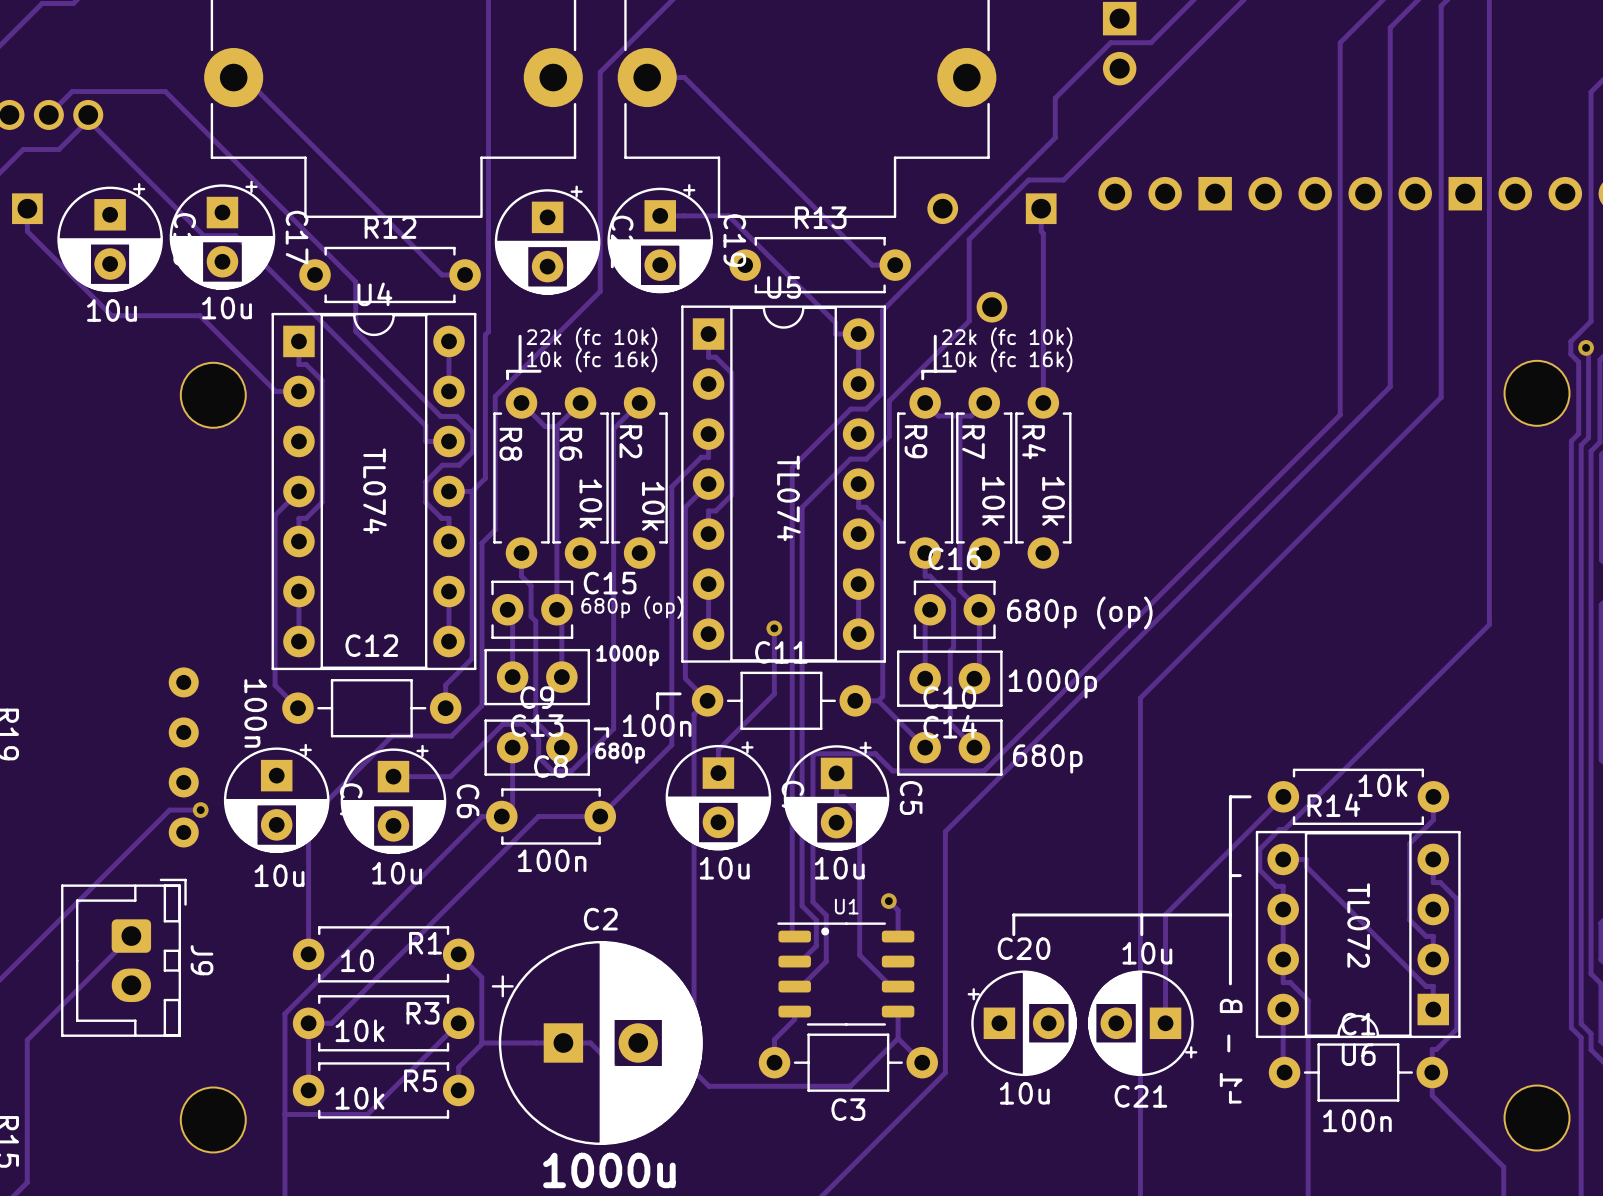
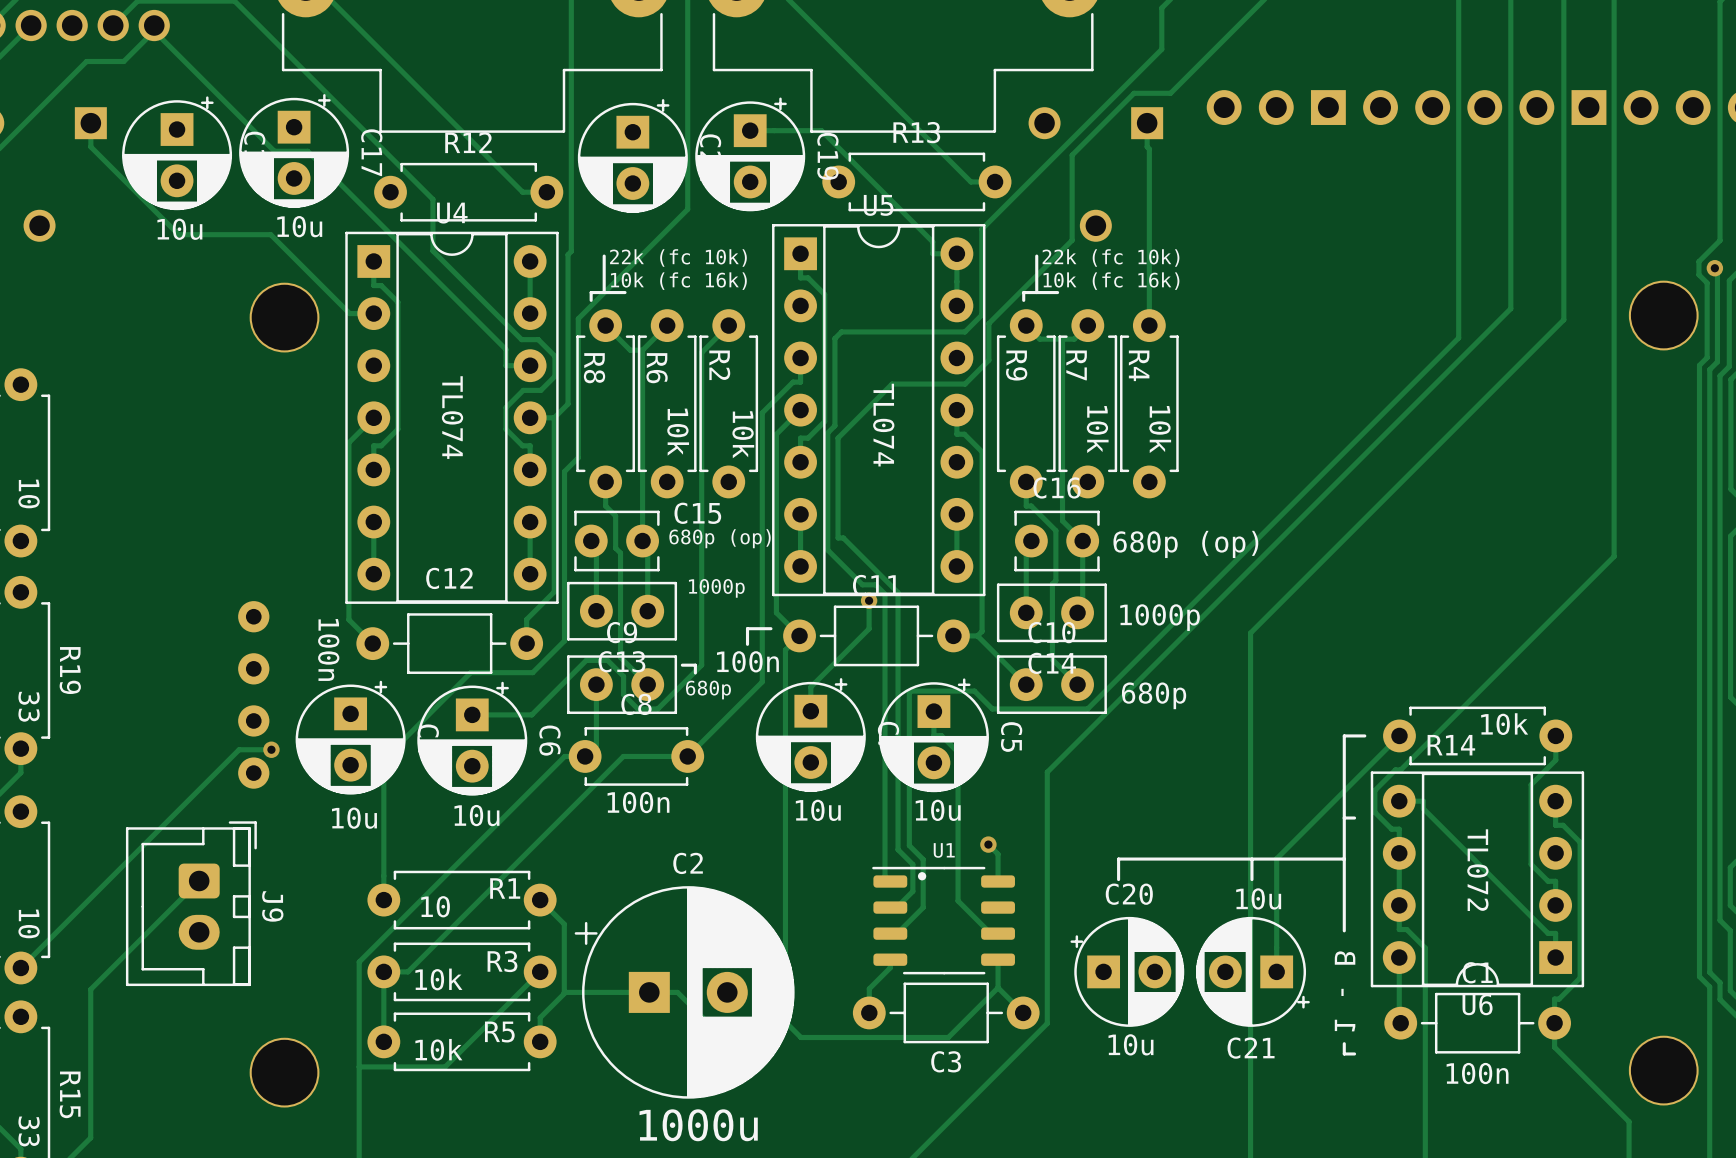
track: (850, 409) (792, 467) (792, 934) -> (948, 331) (841, 331) (834, 338) (834, 425) (827, 432) (827, 550) (862, 584) (875, 584) (885, 594) (885, 876) (887, 878)
track: (850, 459) (802, 507) (802, 659) -> (948, 384) (892, 384) (838, 438) (838, 537) (843, 538) (898, 592)
track: (774, 628) (774, 667) -> none
via position: (774, 628) -> (869, 600)

